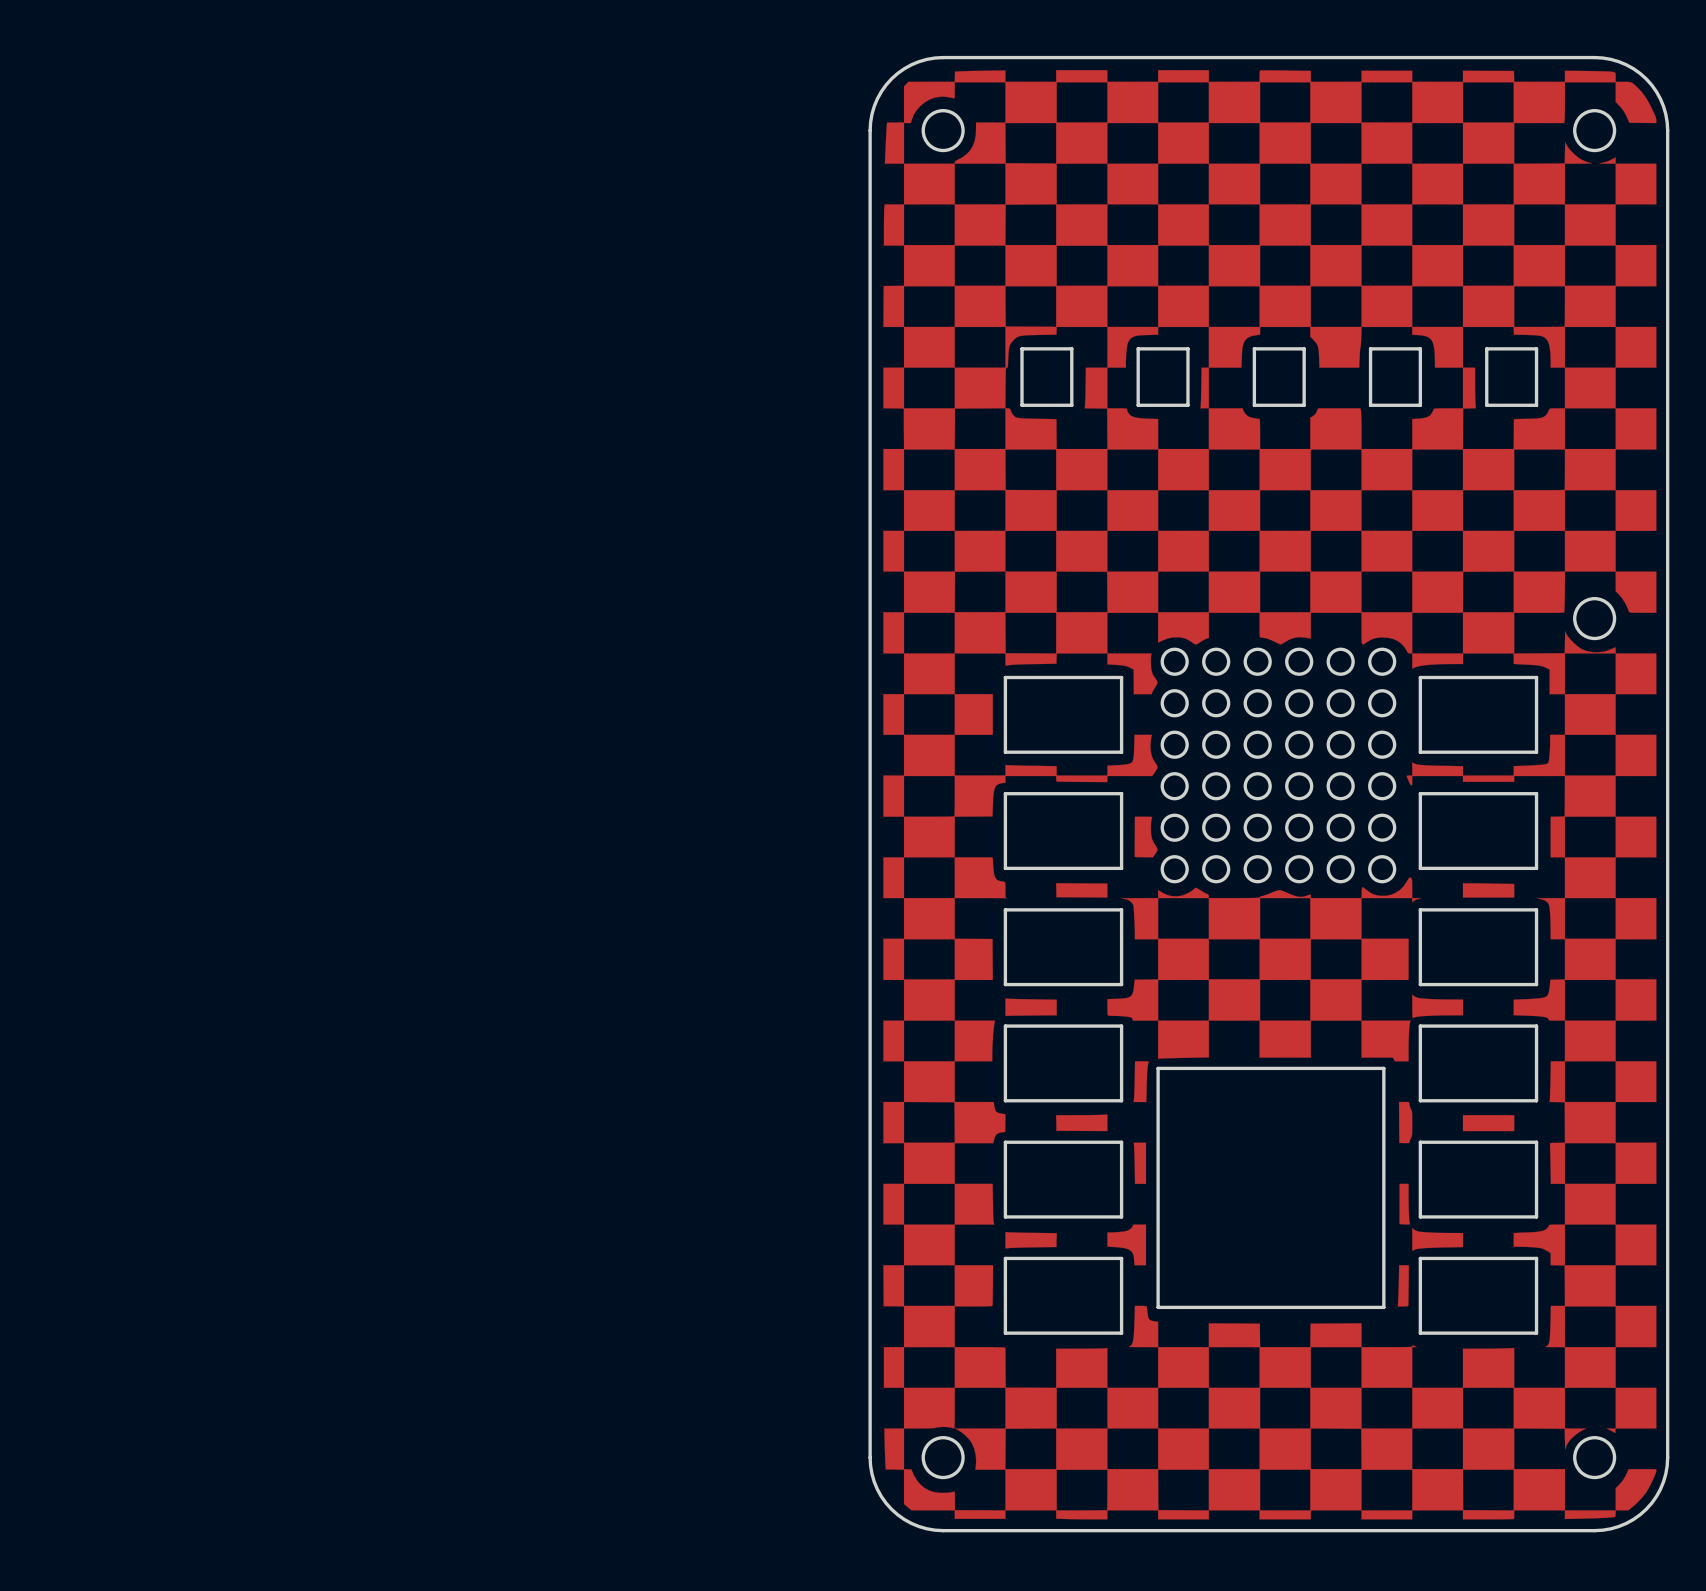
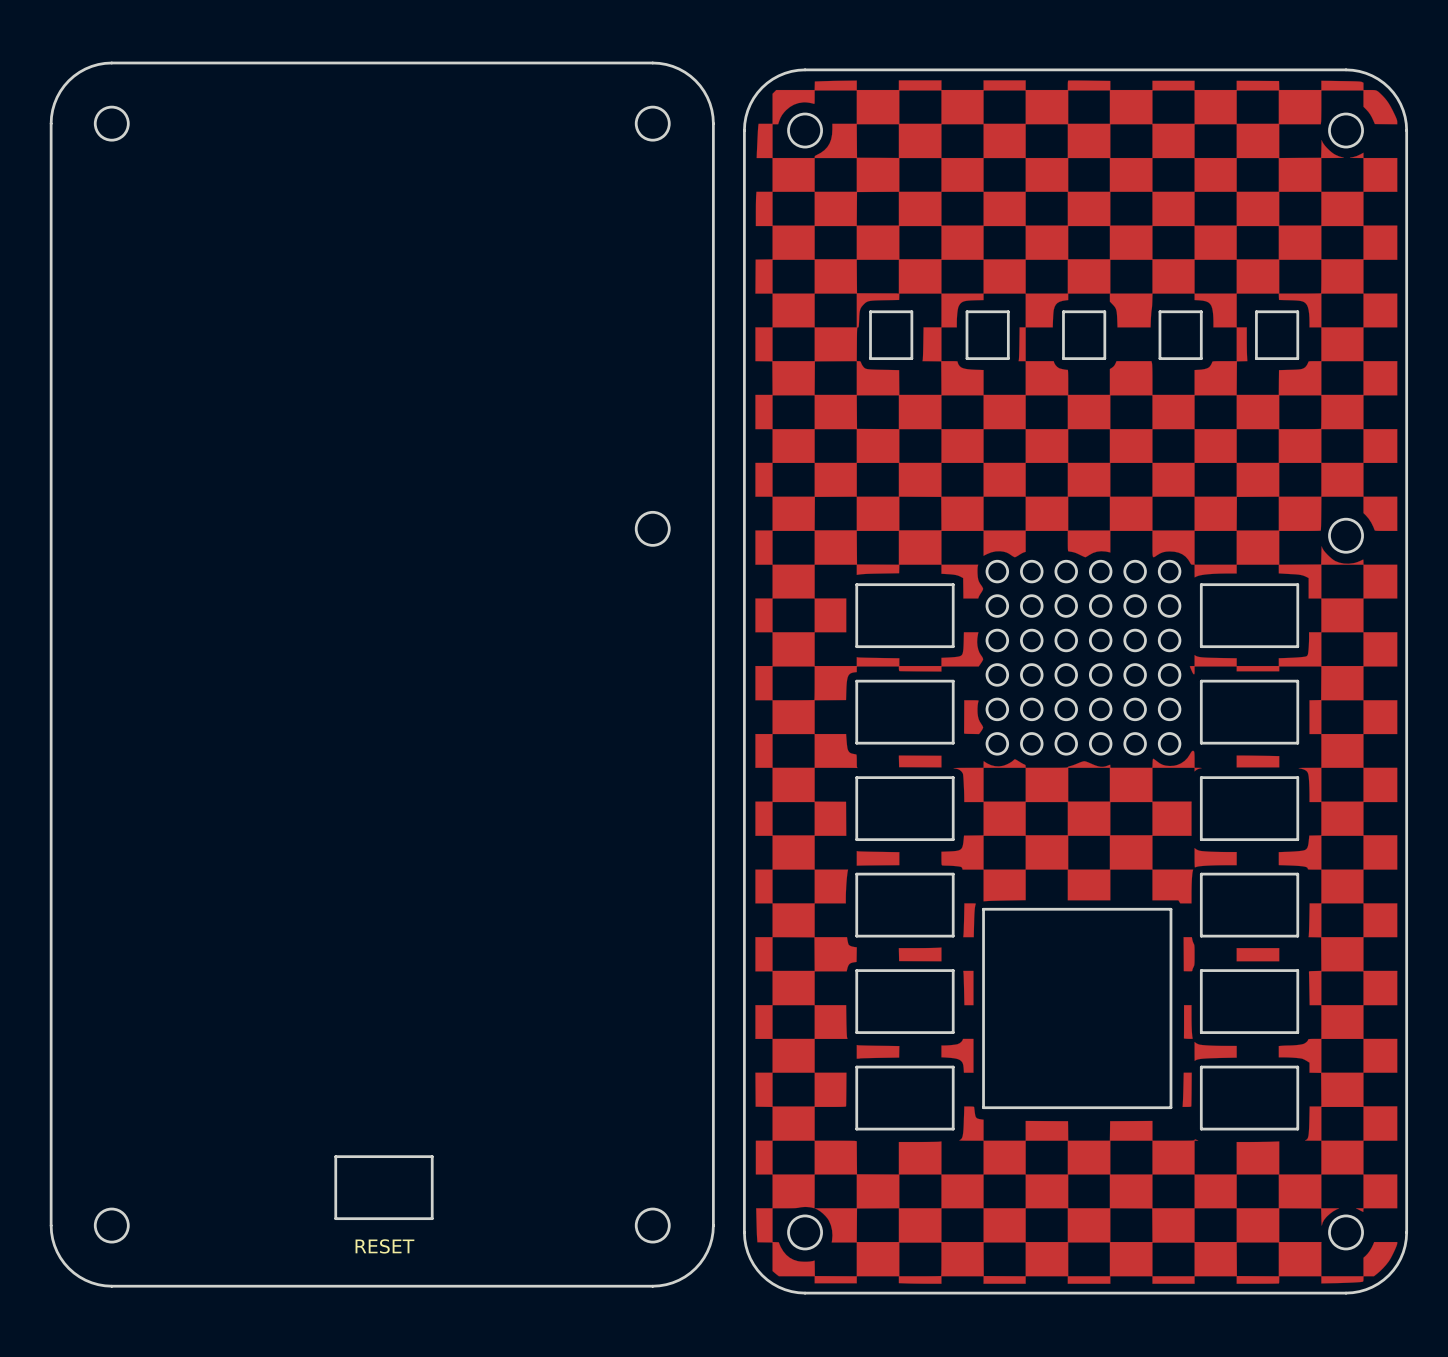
board edge: none -> (652, 62) (104, 63) (91, 66) (79, 72) (64, 85) (57, 97) (52, 110) (51, 123) (51, 1225) (52, 1239) (60, 1257) (68, 1268) (85, 1280) (98, 1284) (111, 1286) (652, 1286) (672, 1282) (685, 1276) (700, 1263) (707, 1251) (711, 1239) (713, 1225) (713, 123) (709, 103) (704, 91) (695, 80) (685, 72) (672, 66) (652, 62)
round board edge: none -> [93, 105, 130, 142]
round board edge: none -> [634, 105, 671, 142]
round board edge: none -> [634, 510, 671, 547]
board edge: none -> (432, 1156) (432, 1218) (335, 1218) (335, 1156) (432, 1156)
round board edge: none -> [93, 1207, 130, 1244]
round board edge: none -> [634, 1207, 671, 1244]
text: none -> RESET (384, 1246)

